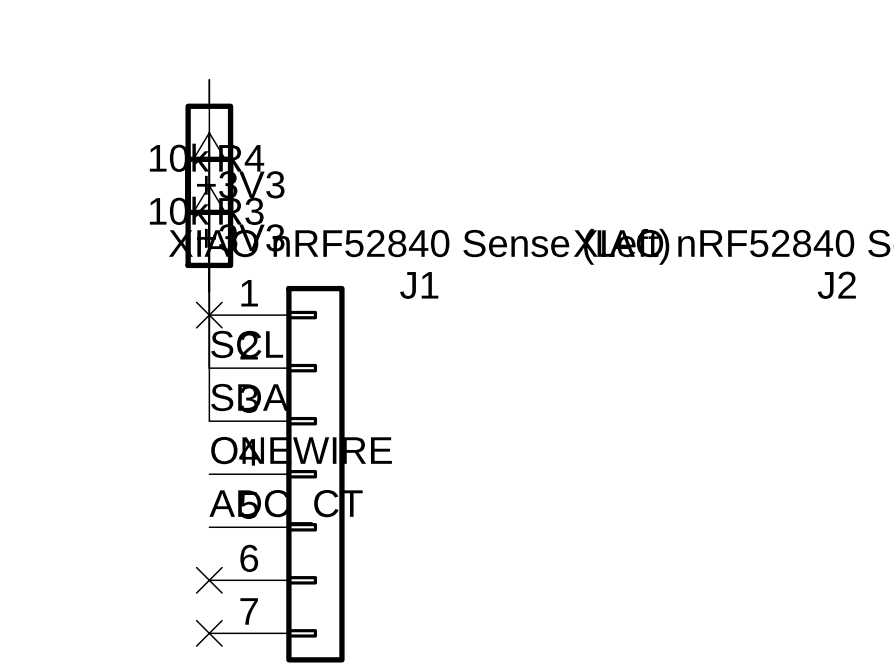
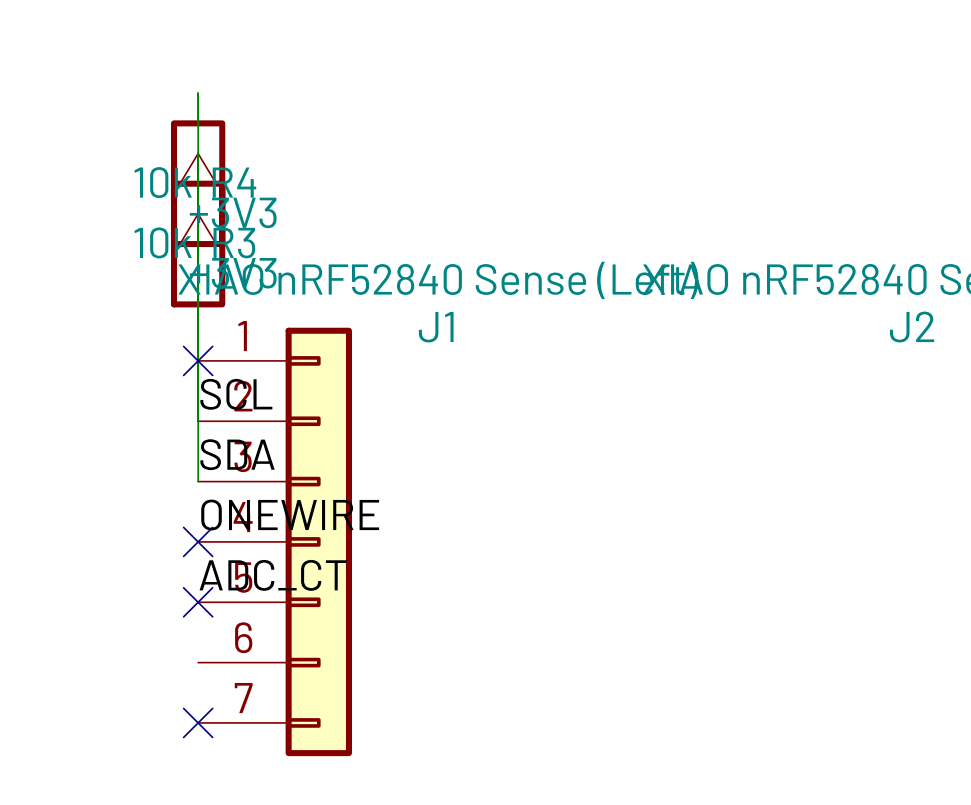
no-connect mark: none -> (198, 541)
no-connect mark: none -> (198, 602)
no-connect mark: (209, 580) -> none

